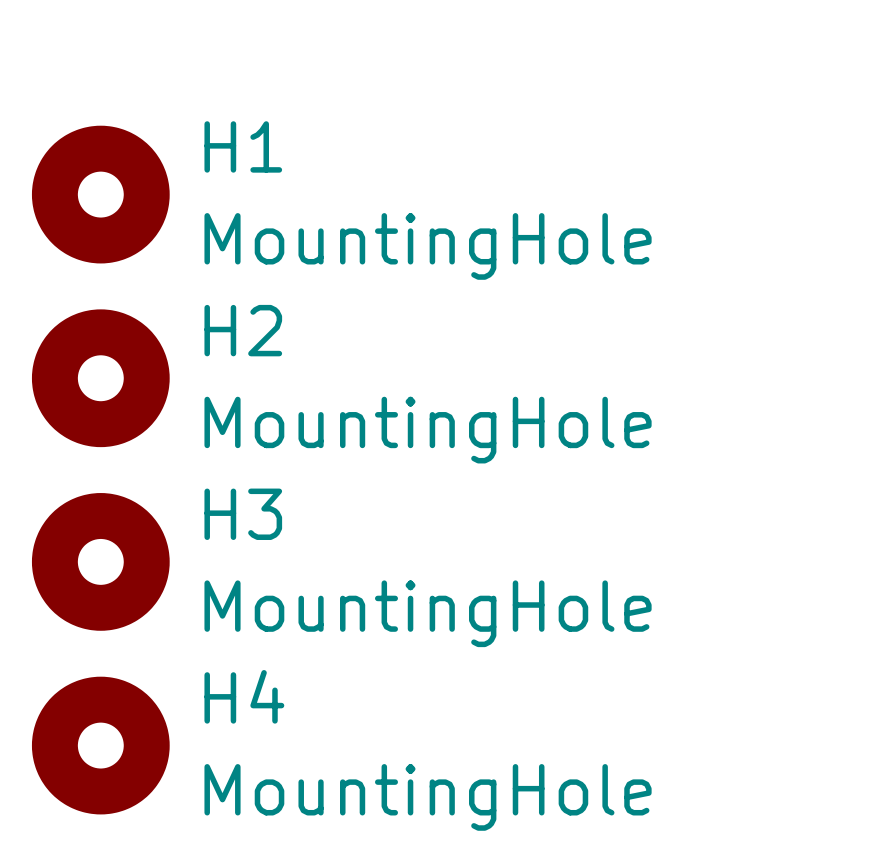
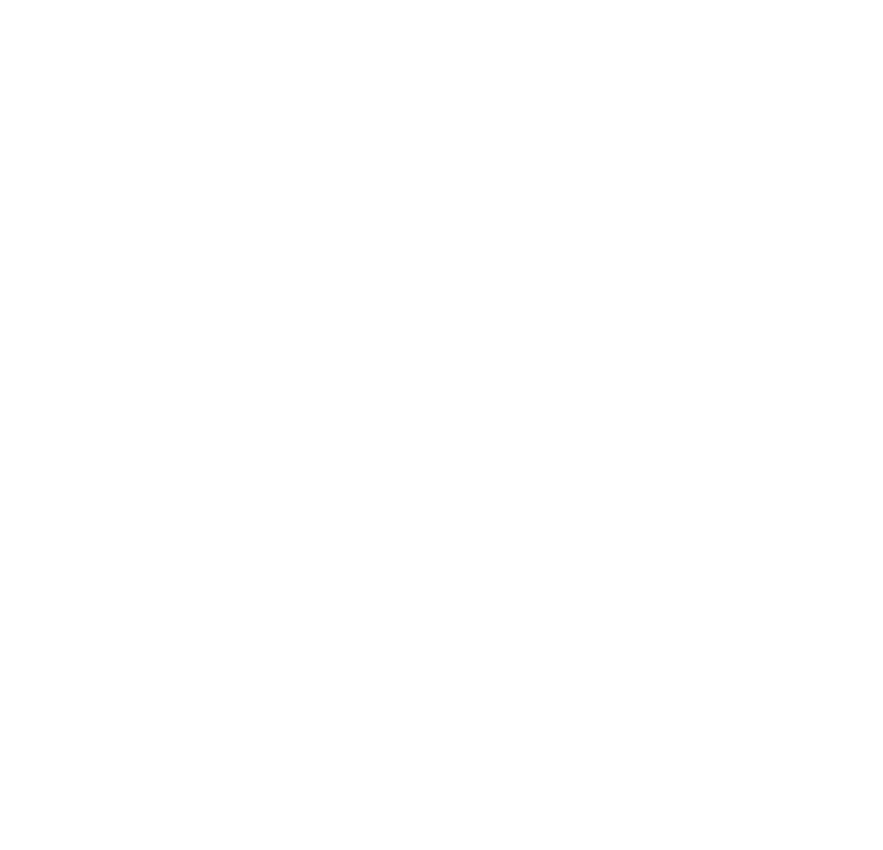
H1: MountingHole (100, 194) -> none
H2: MountingHole (100, 378) -> none
H3: MountingHole (100, 561) -> none
H4: MountingHole (100, 745) -> none

